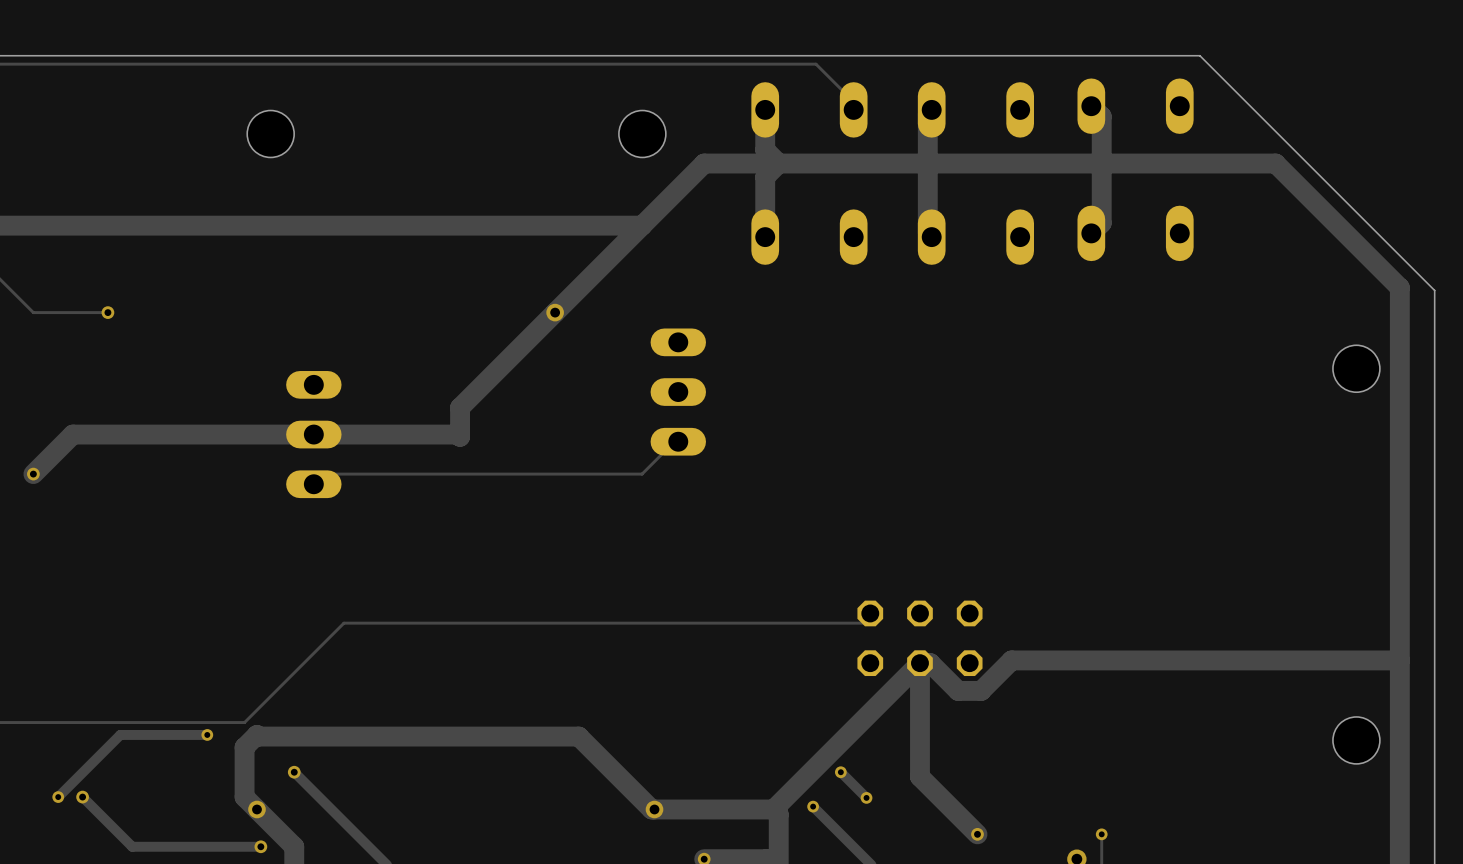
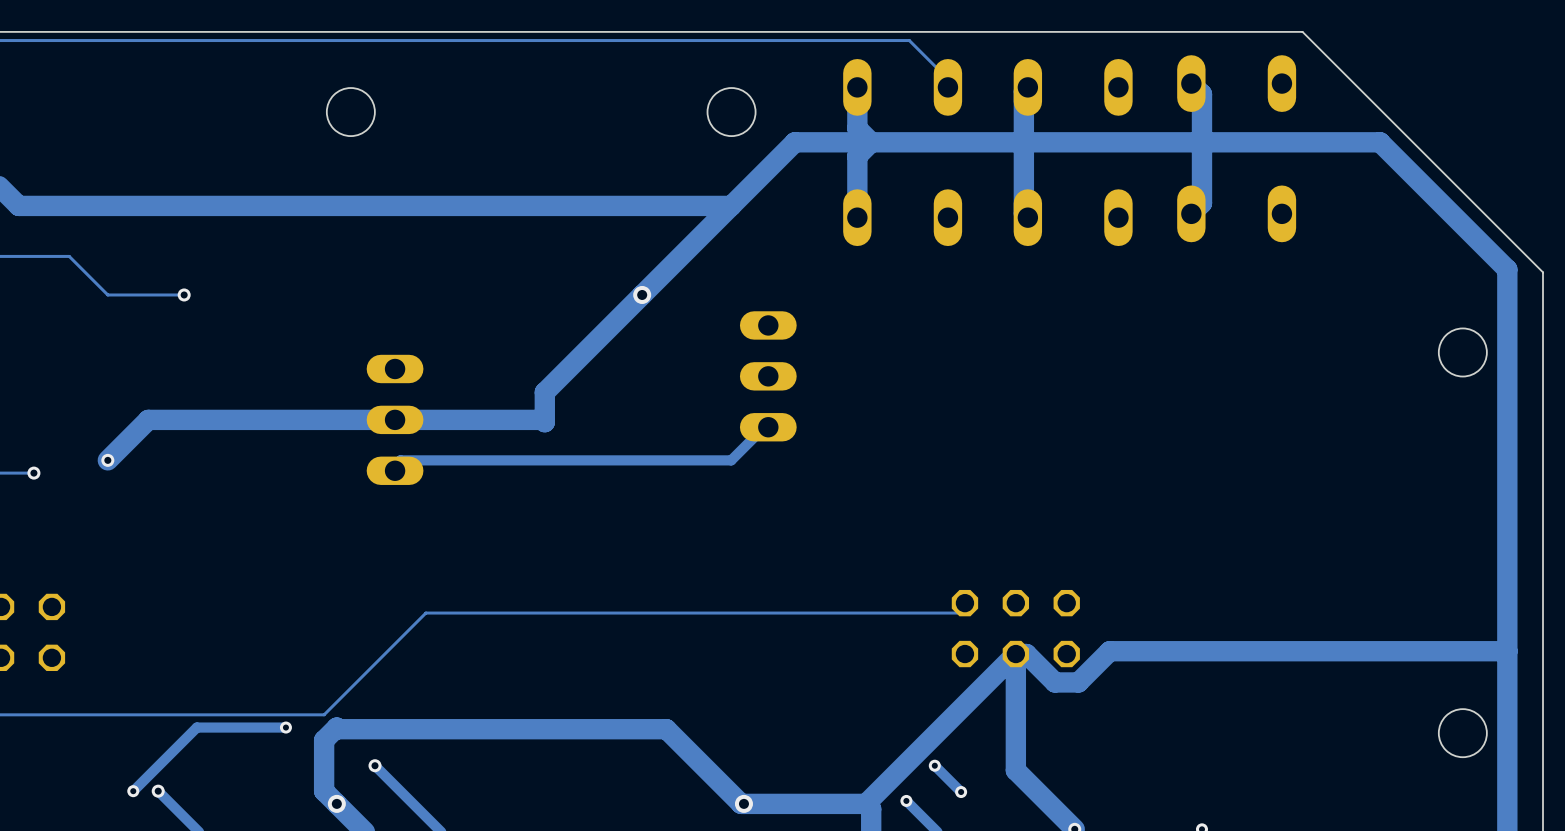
track width: thin (678, 441) (666, 449) (642, 474) (319, 474) (313, 484) -> thick (768, 427) (756, 434) (731, 460) (400, 460) (395, 470)

